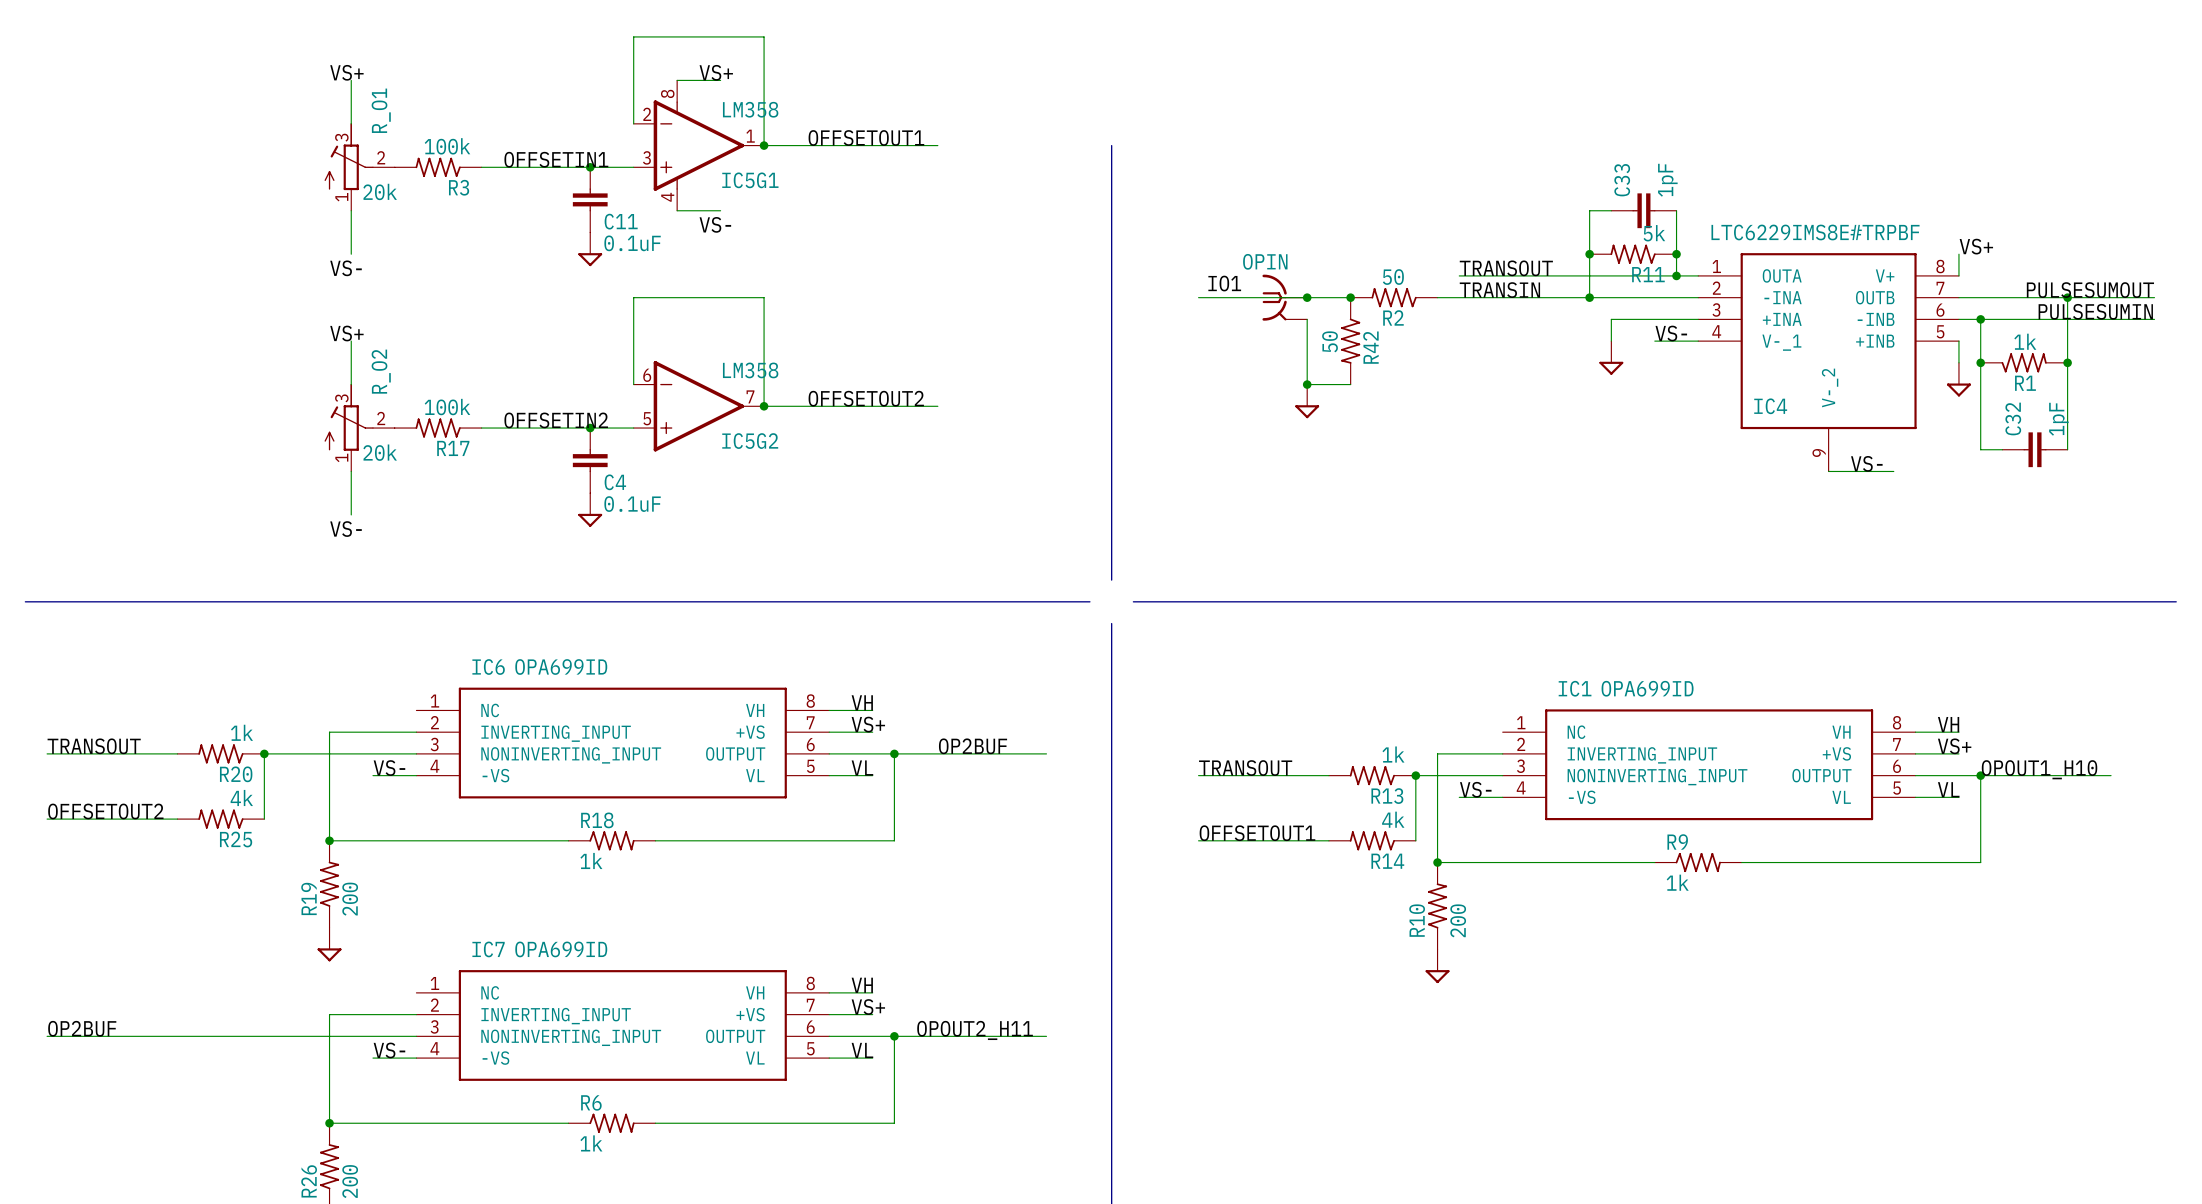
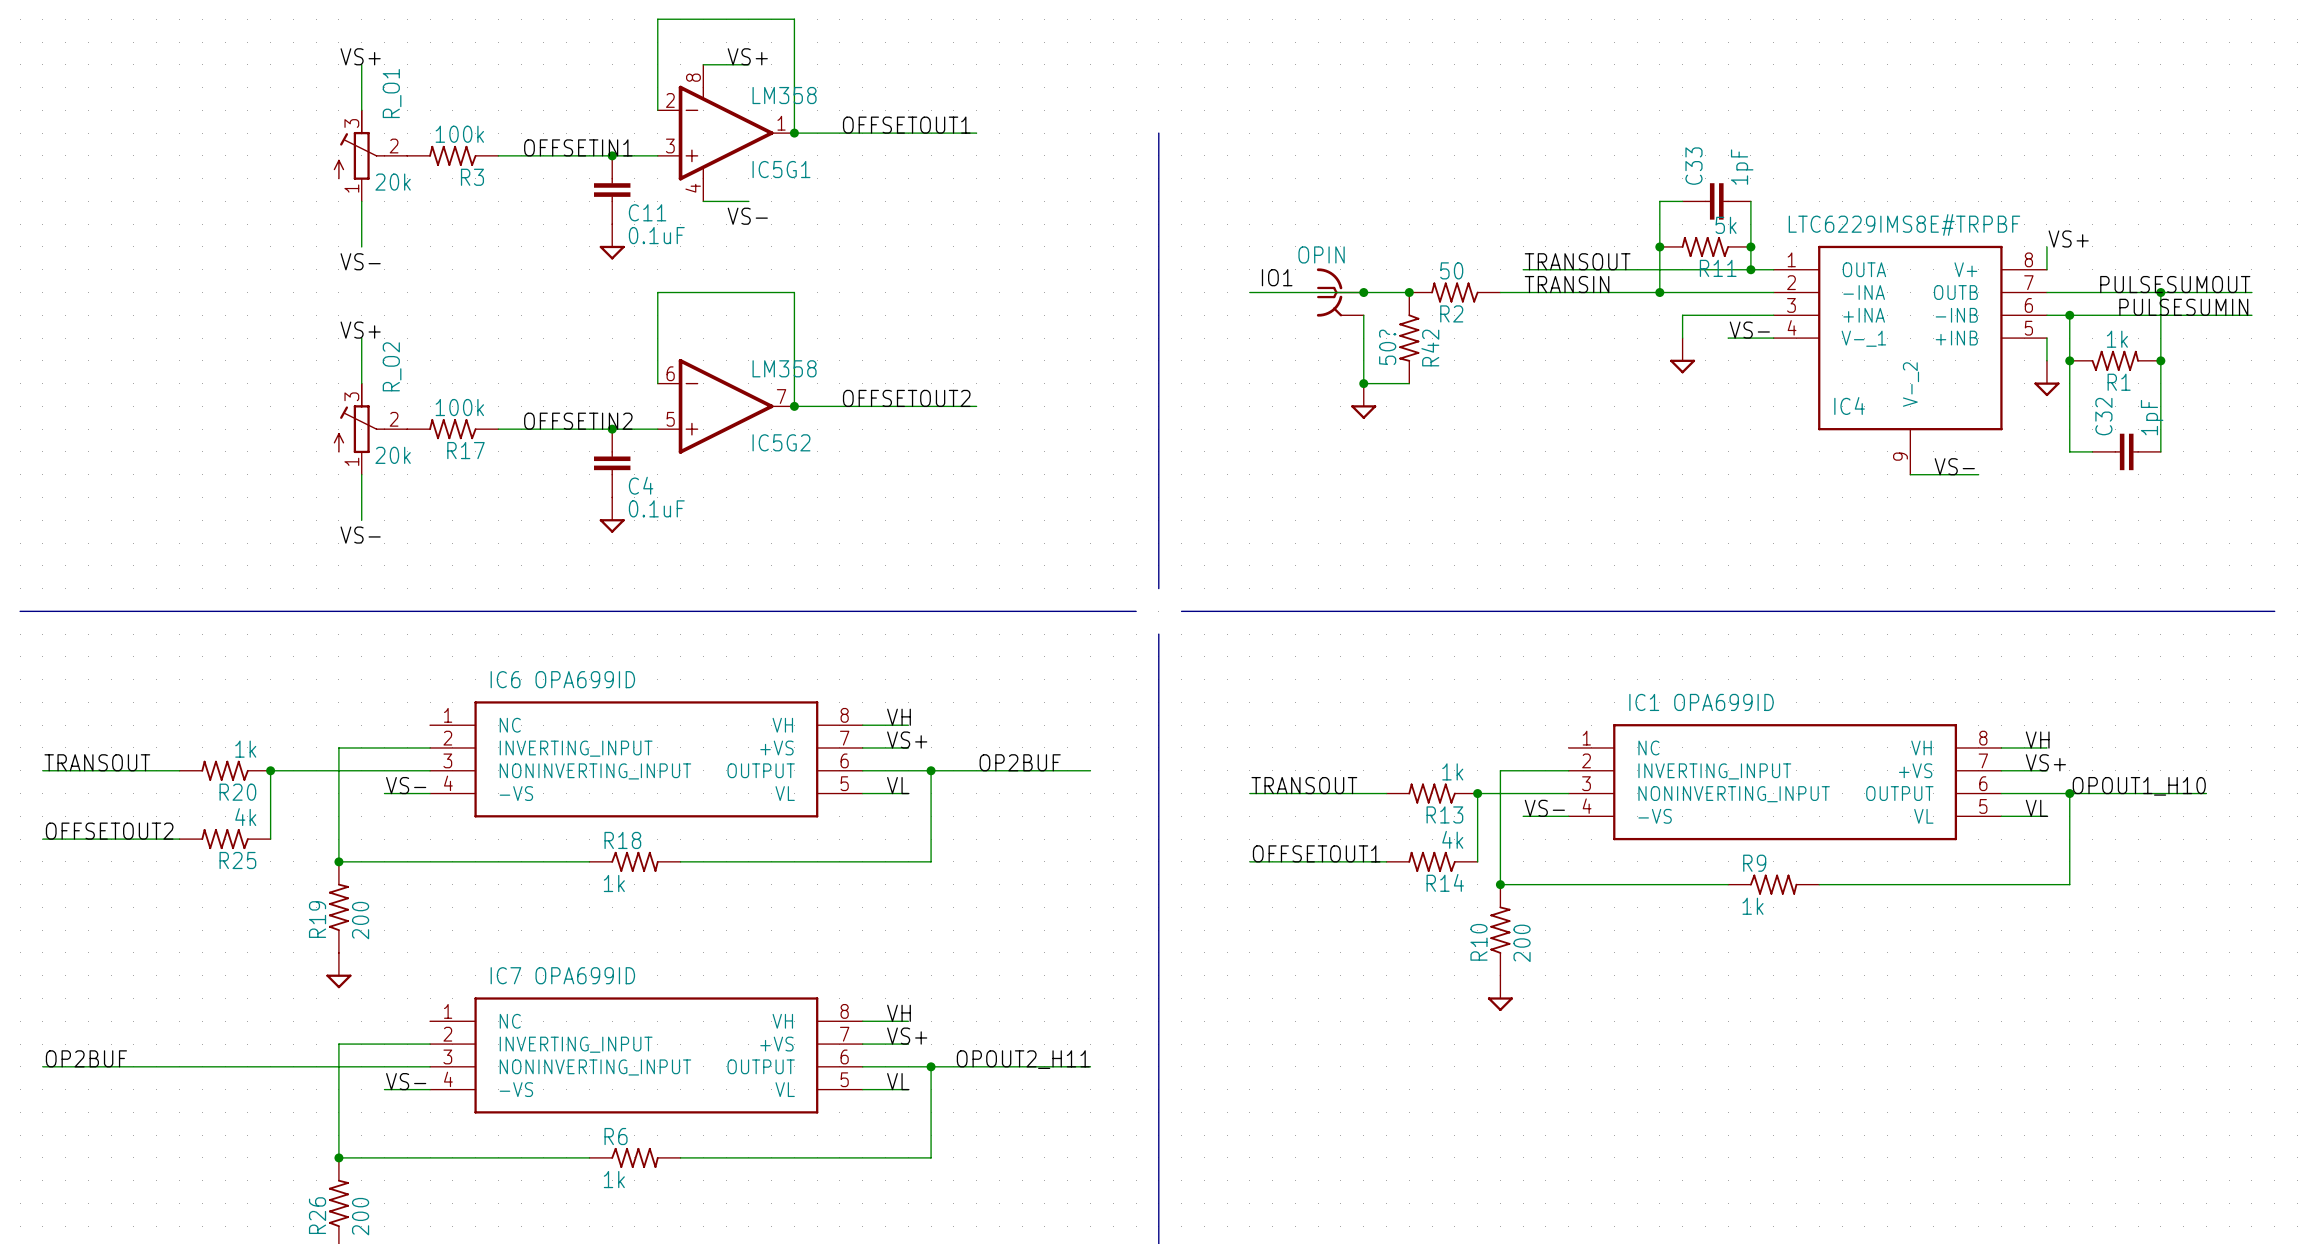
R42 value: 50 (1330, 341) -> 50? (1387, 347)

